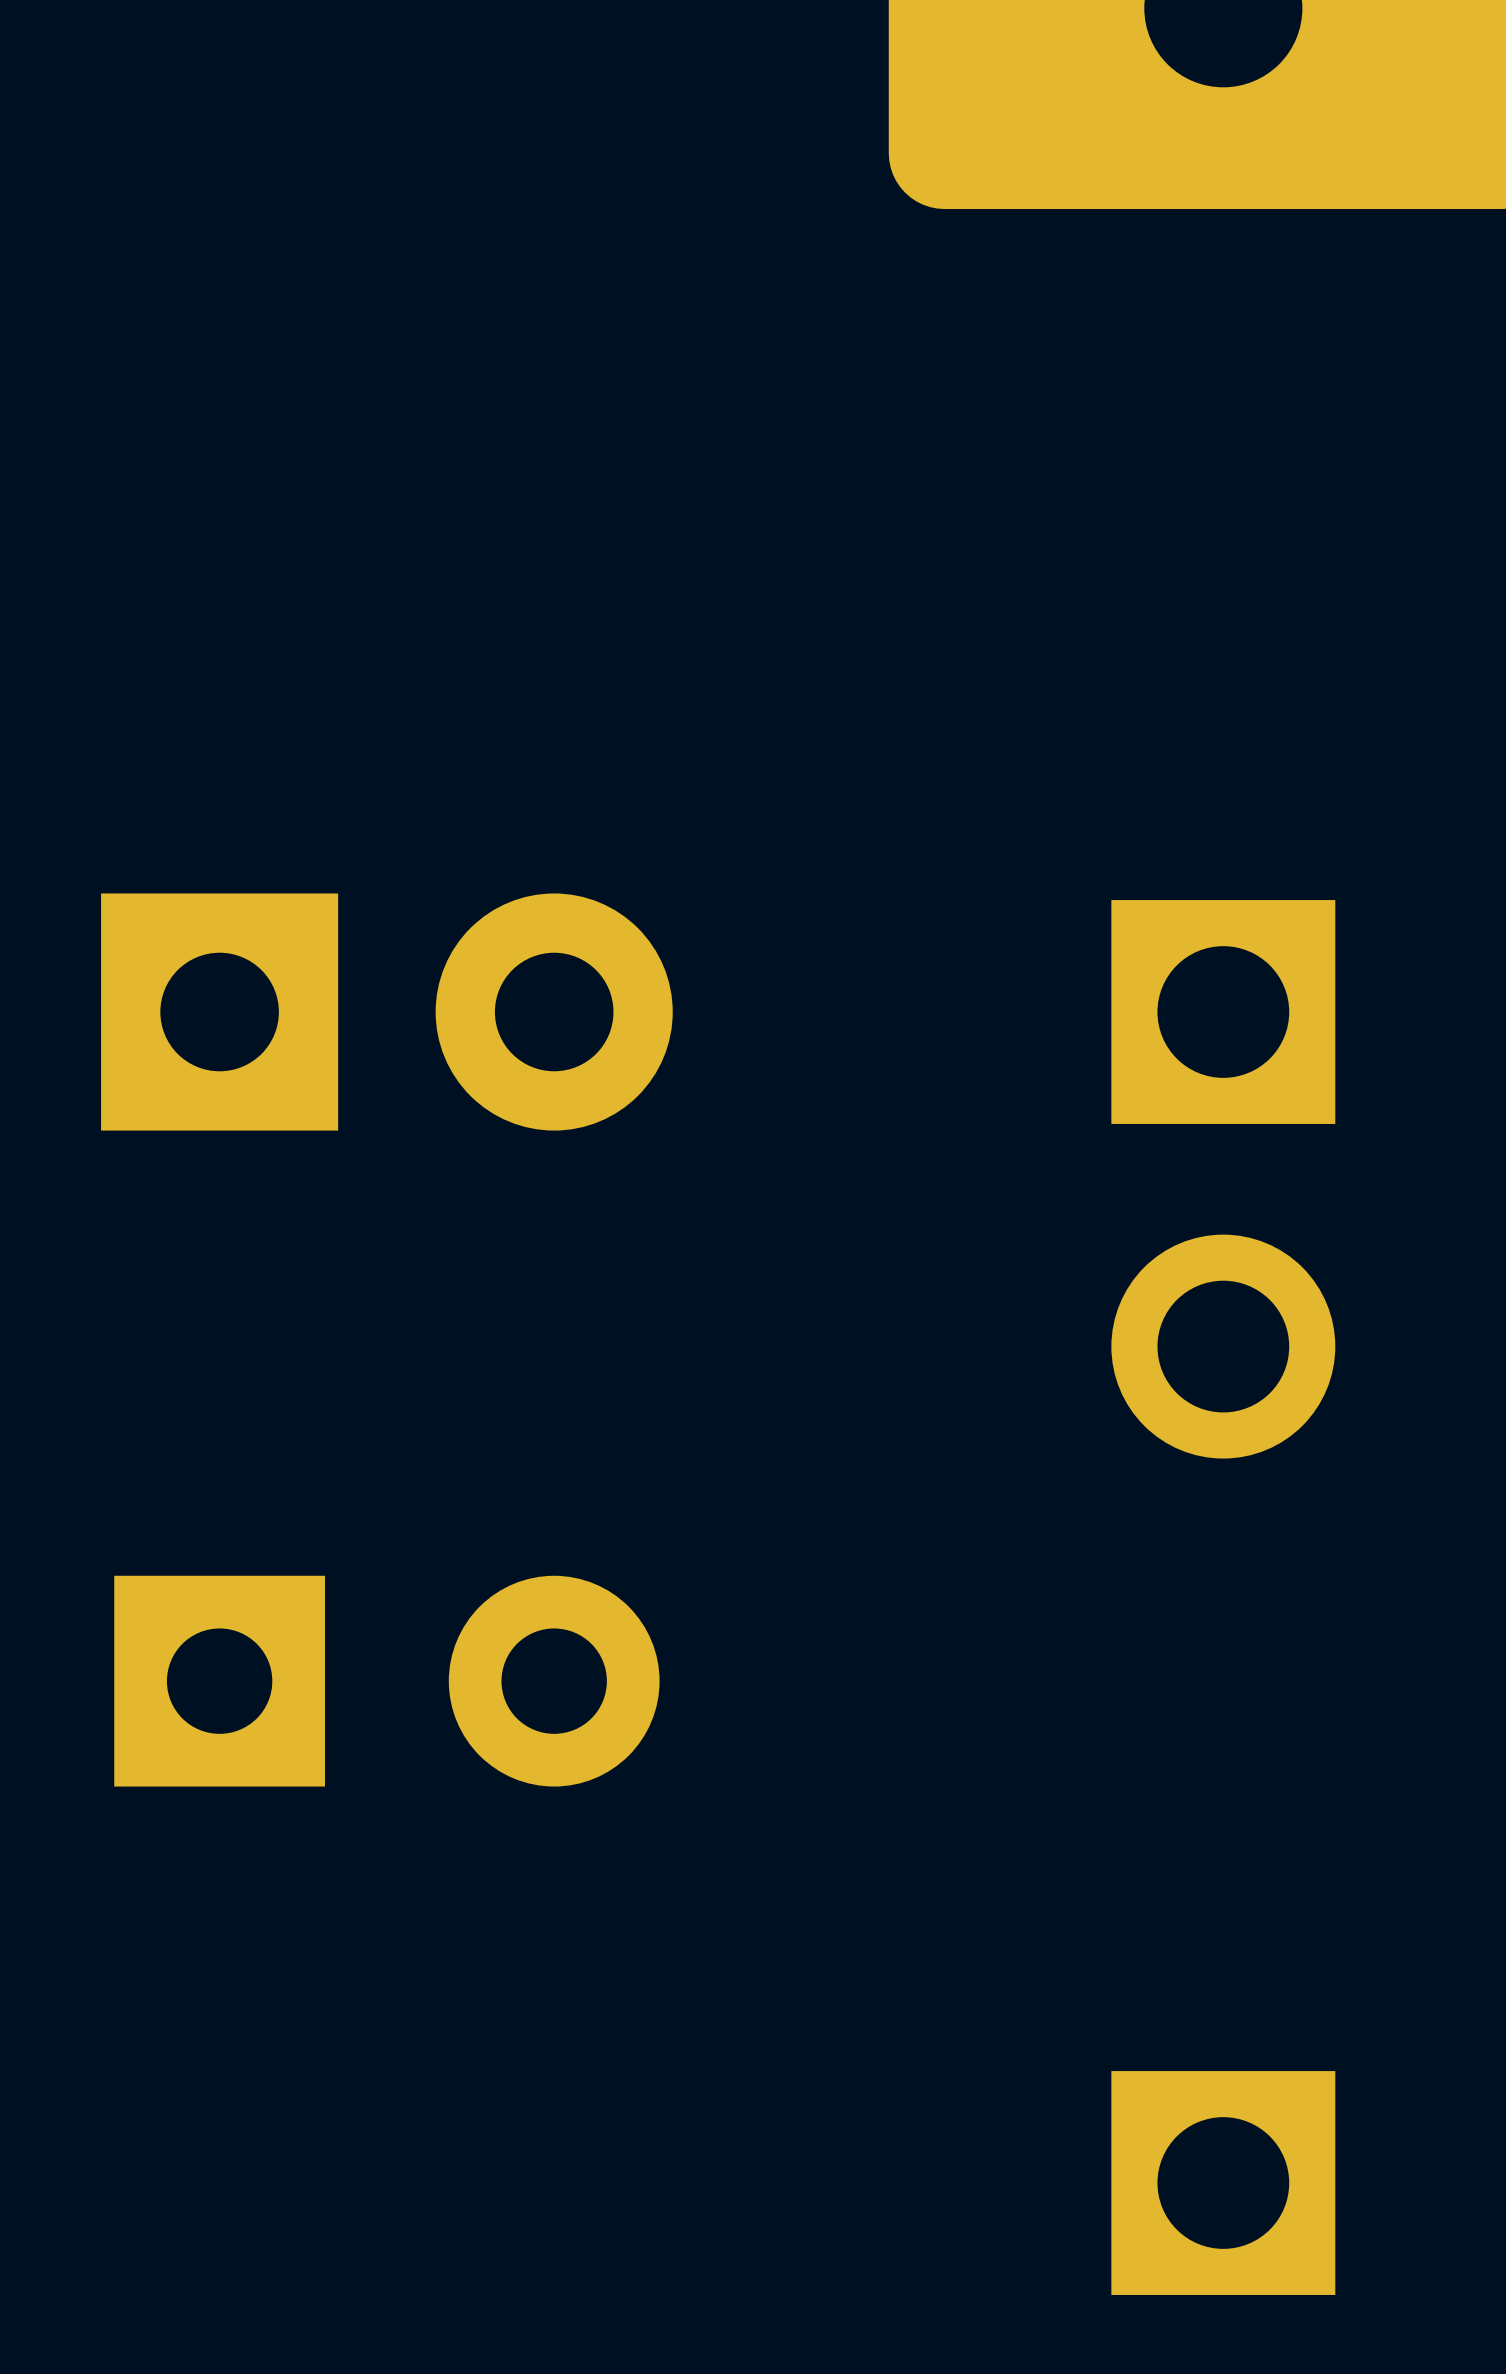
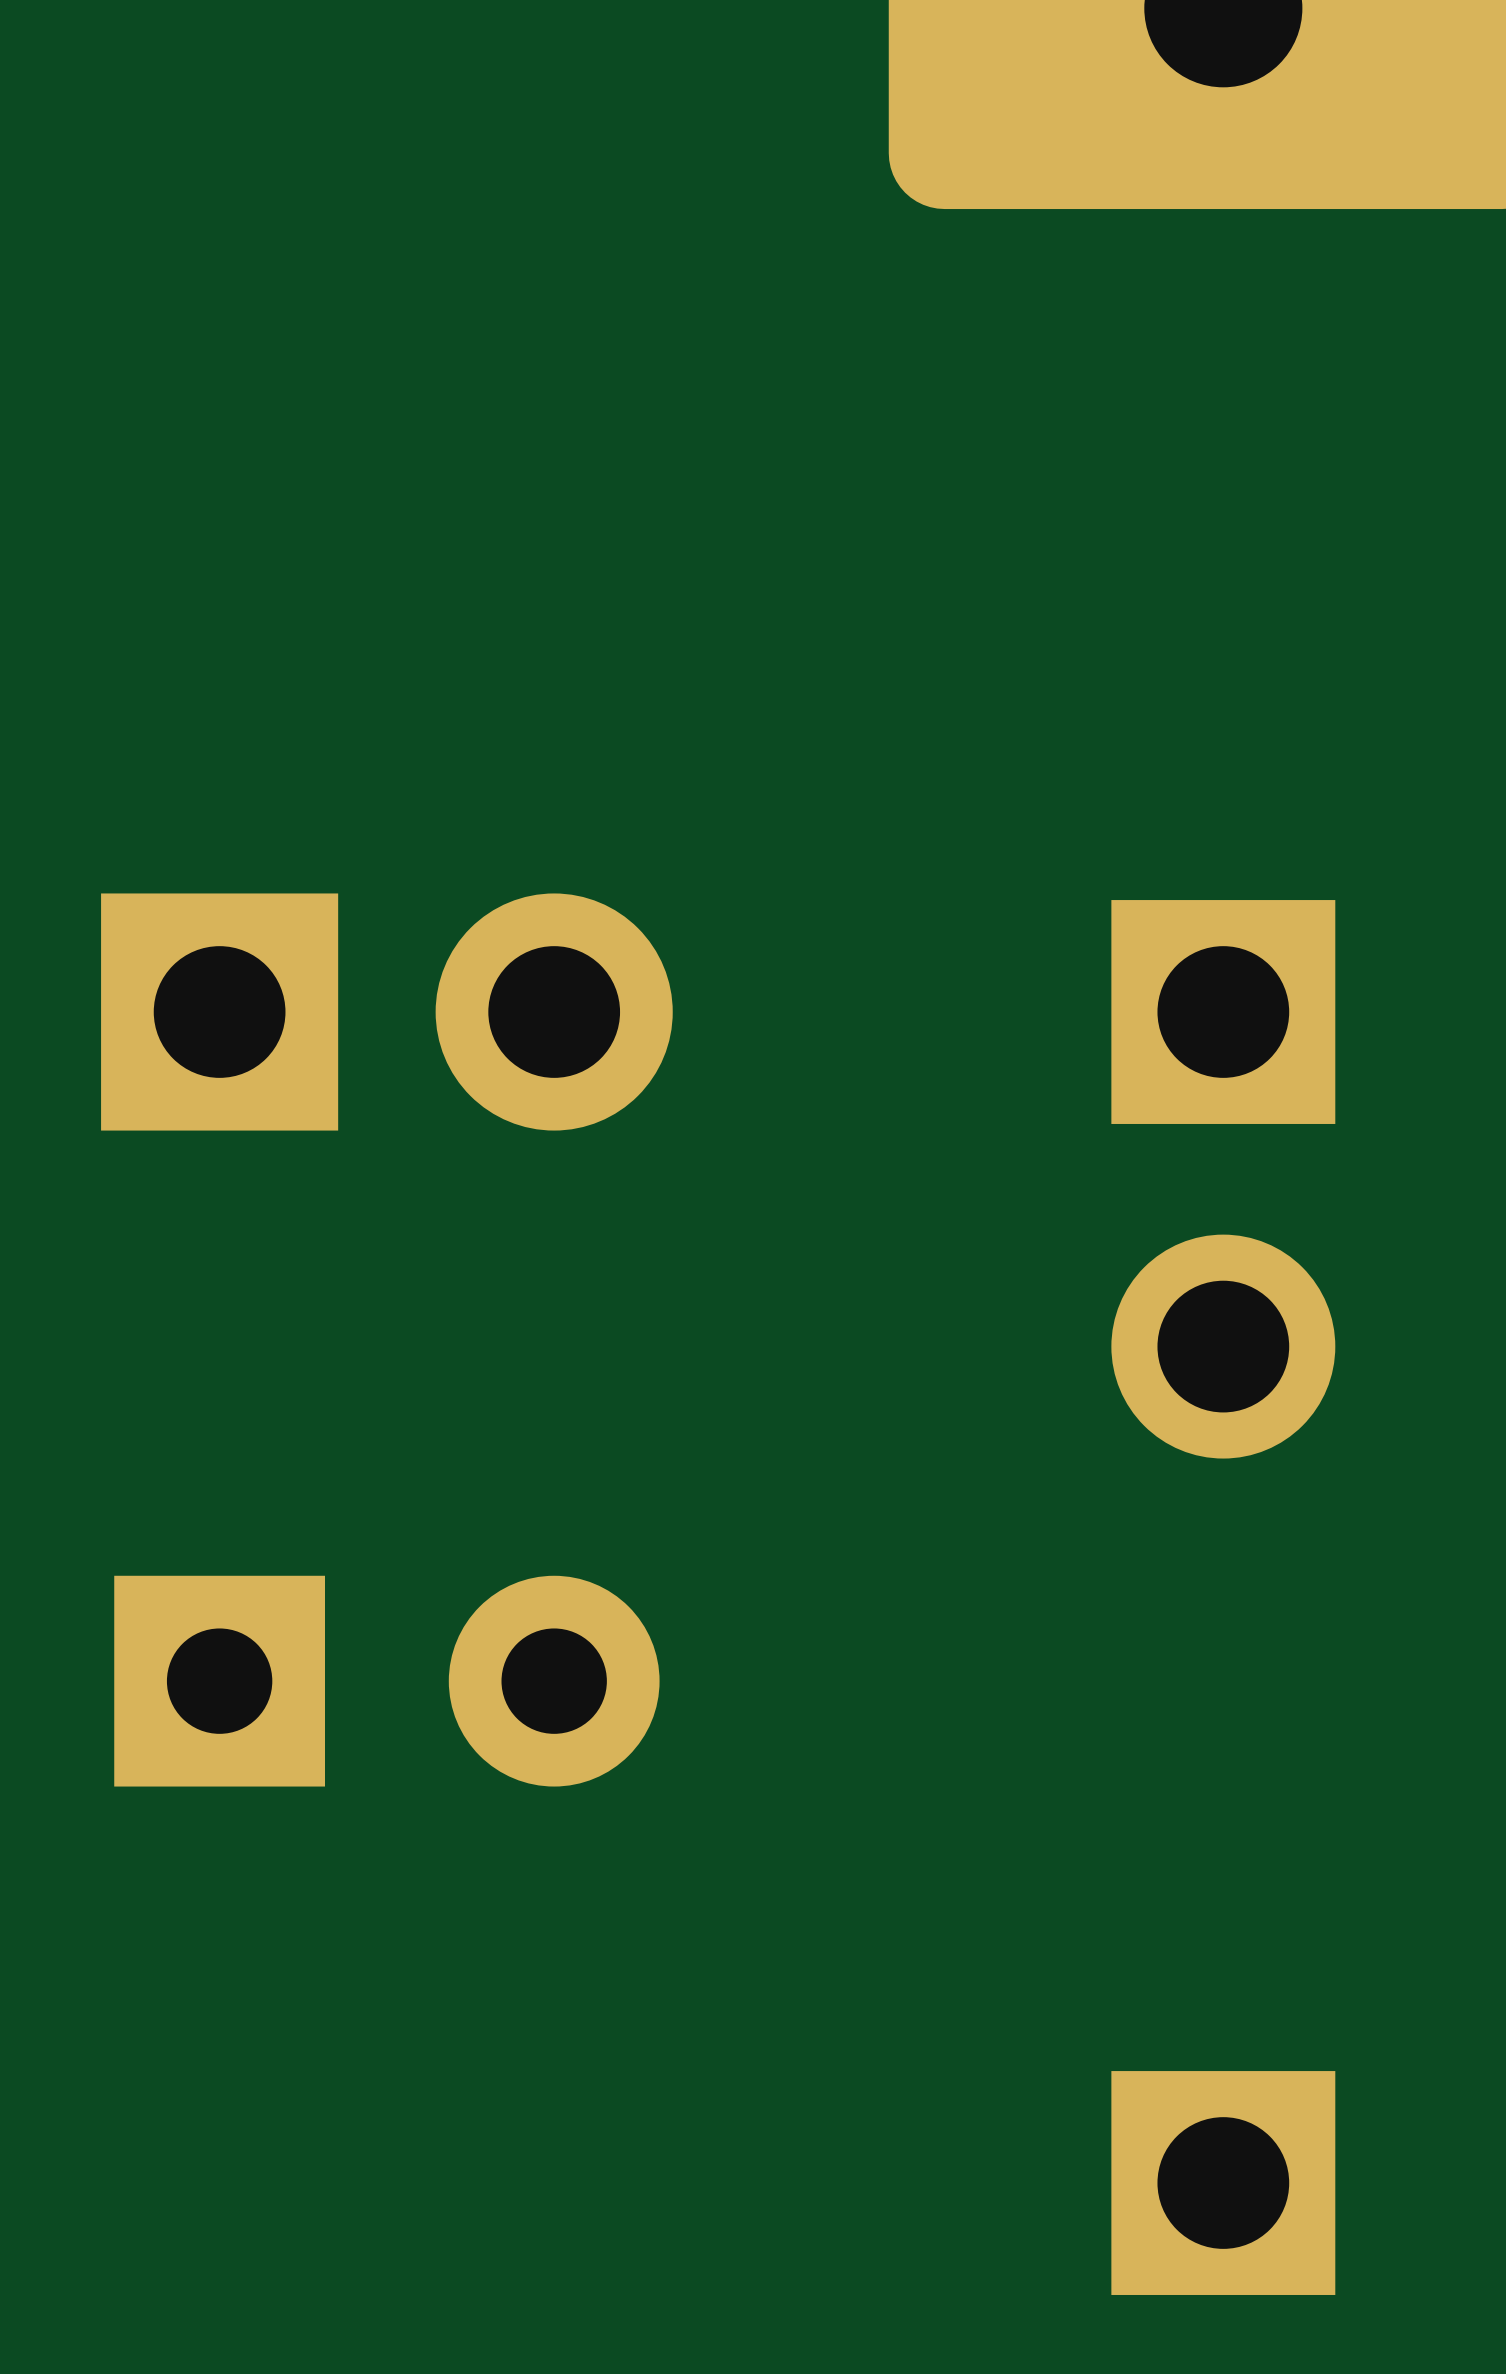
part footprint: [101, 893, 673, 1131] -> [101, 893, 673, 1131]

